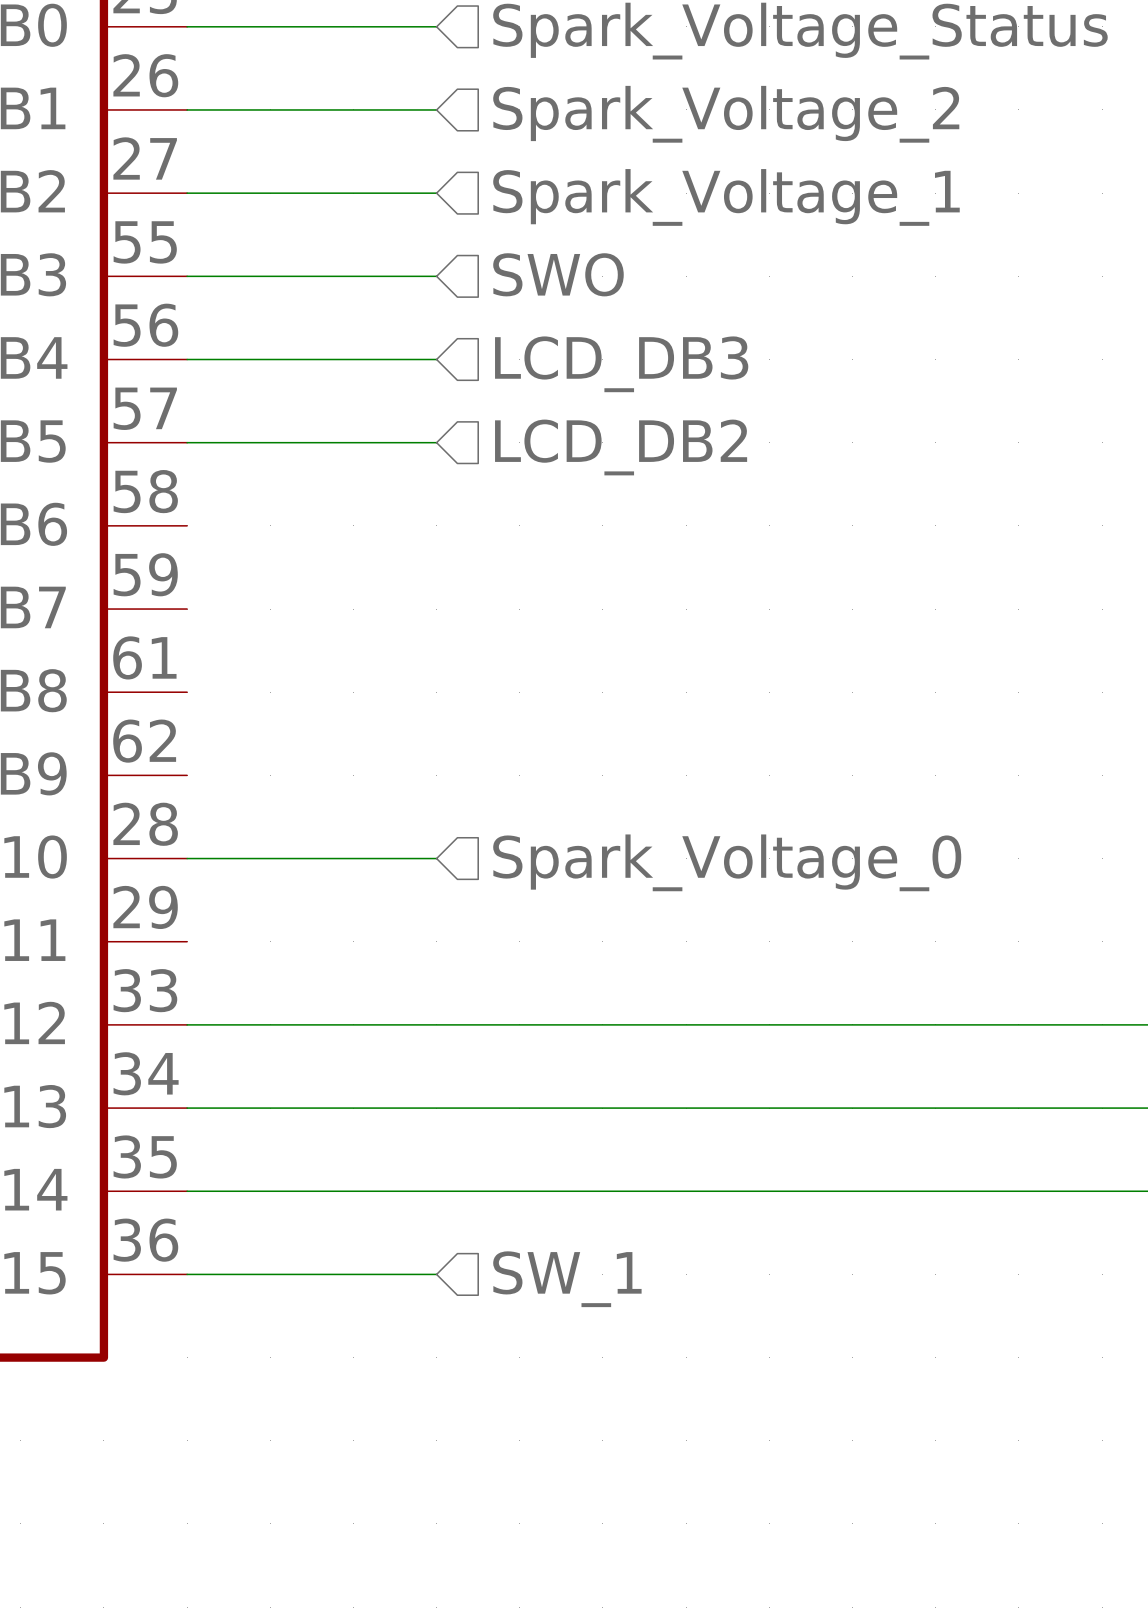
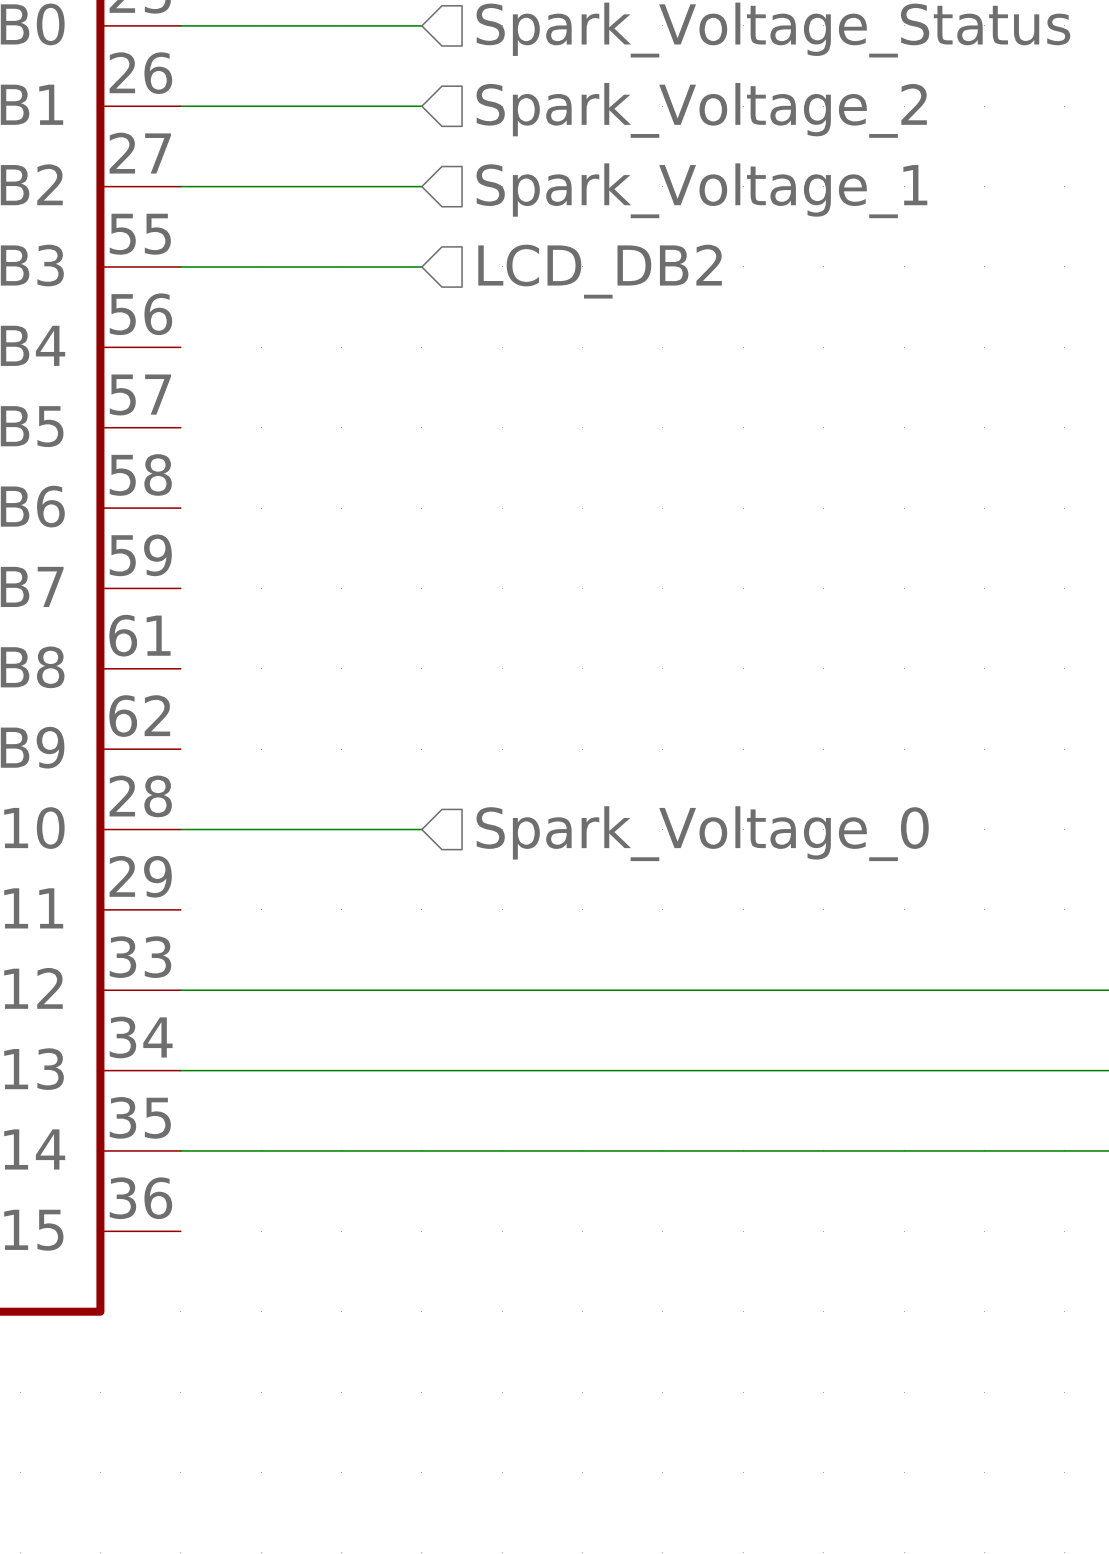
hierarchical label: SWO (558, 274) -> LCD_DB2 (600, 271)
wire: (187, 359) (436, 359) -> none
hierarchical label: LCD_DB3 (621, 364) -> none
wire: (187, 442) (436, 442) -> none
hierarchical label: LCD_DB2 (621, 447) -> none
wire: (187, 1274) (436, 1274) -> none
hierarchical label: SW_1 (567, 1279) -> none

